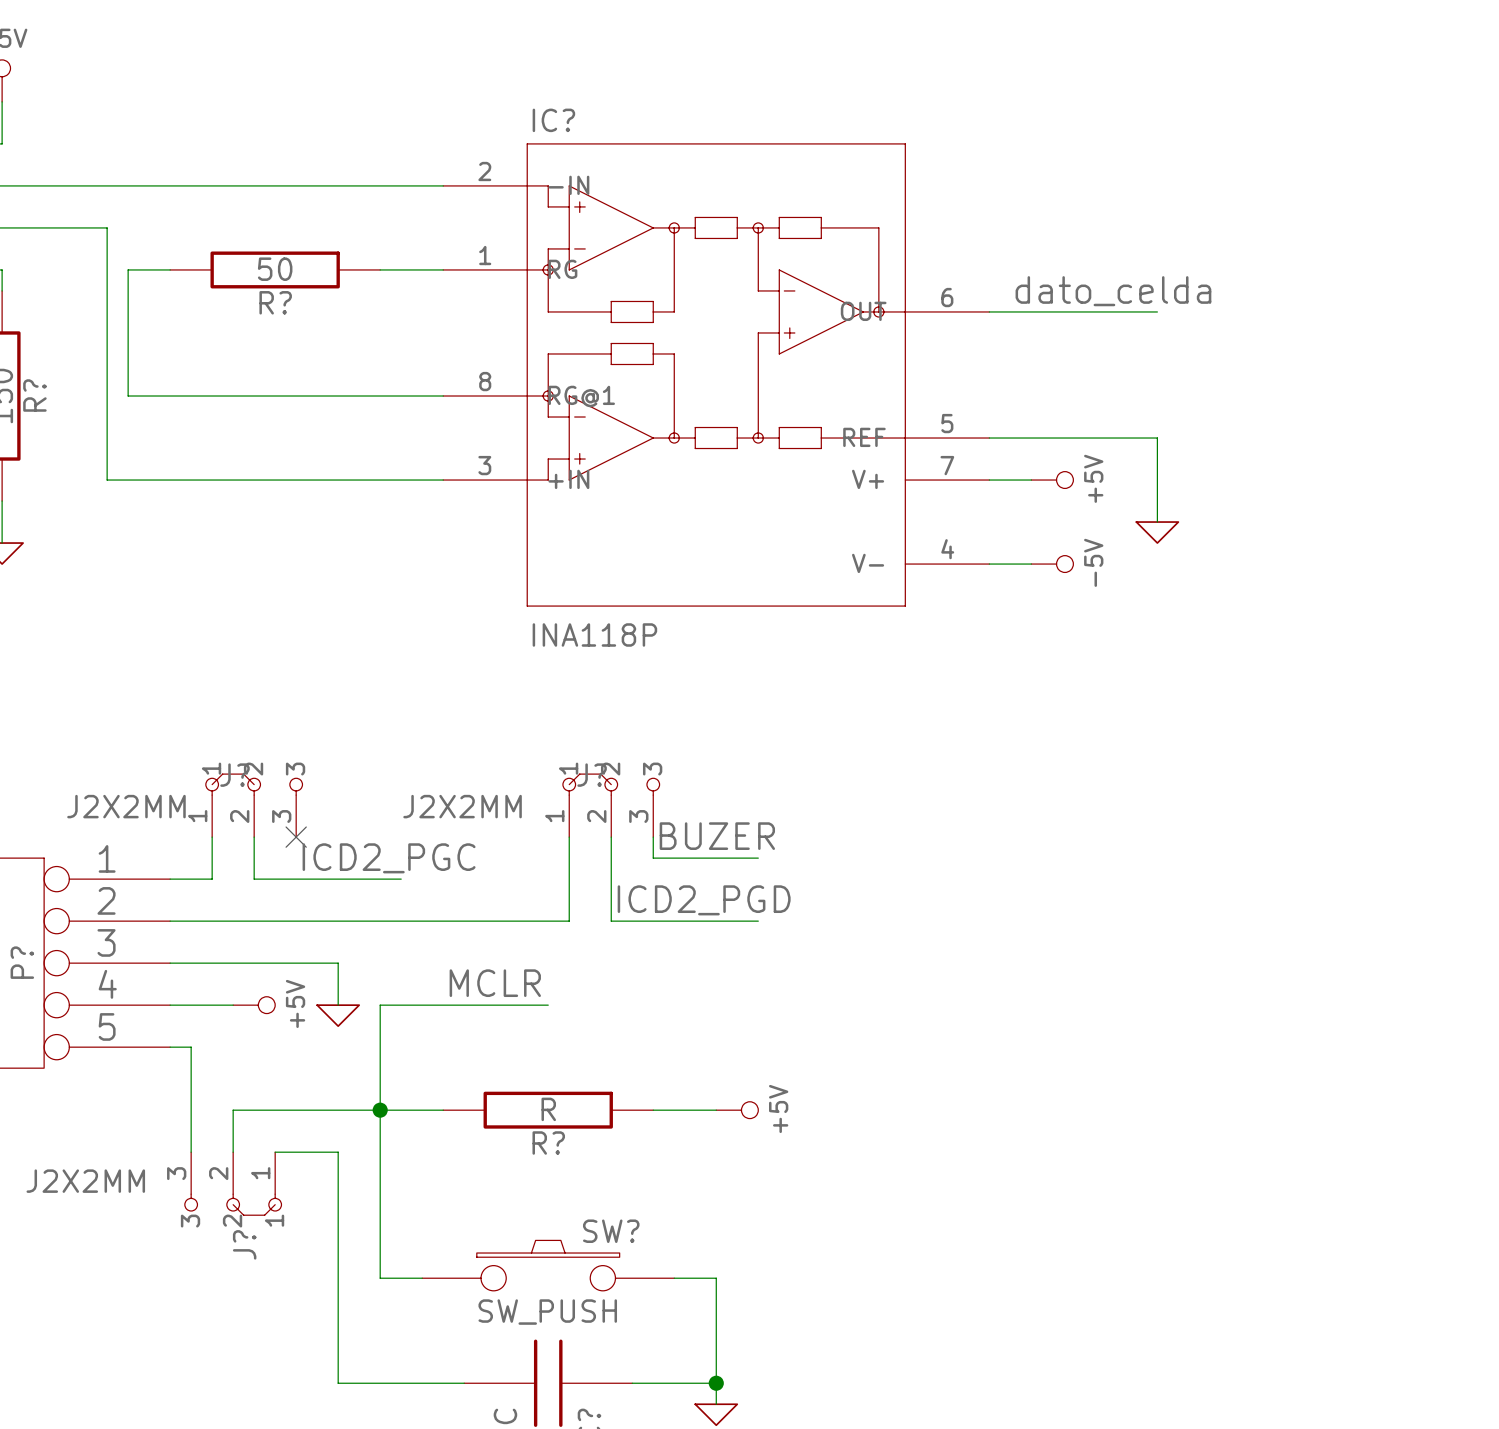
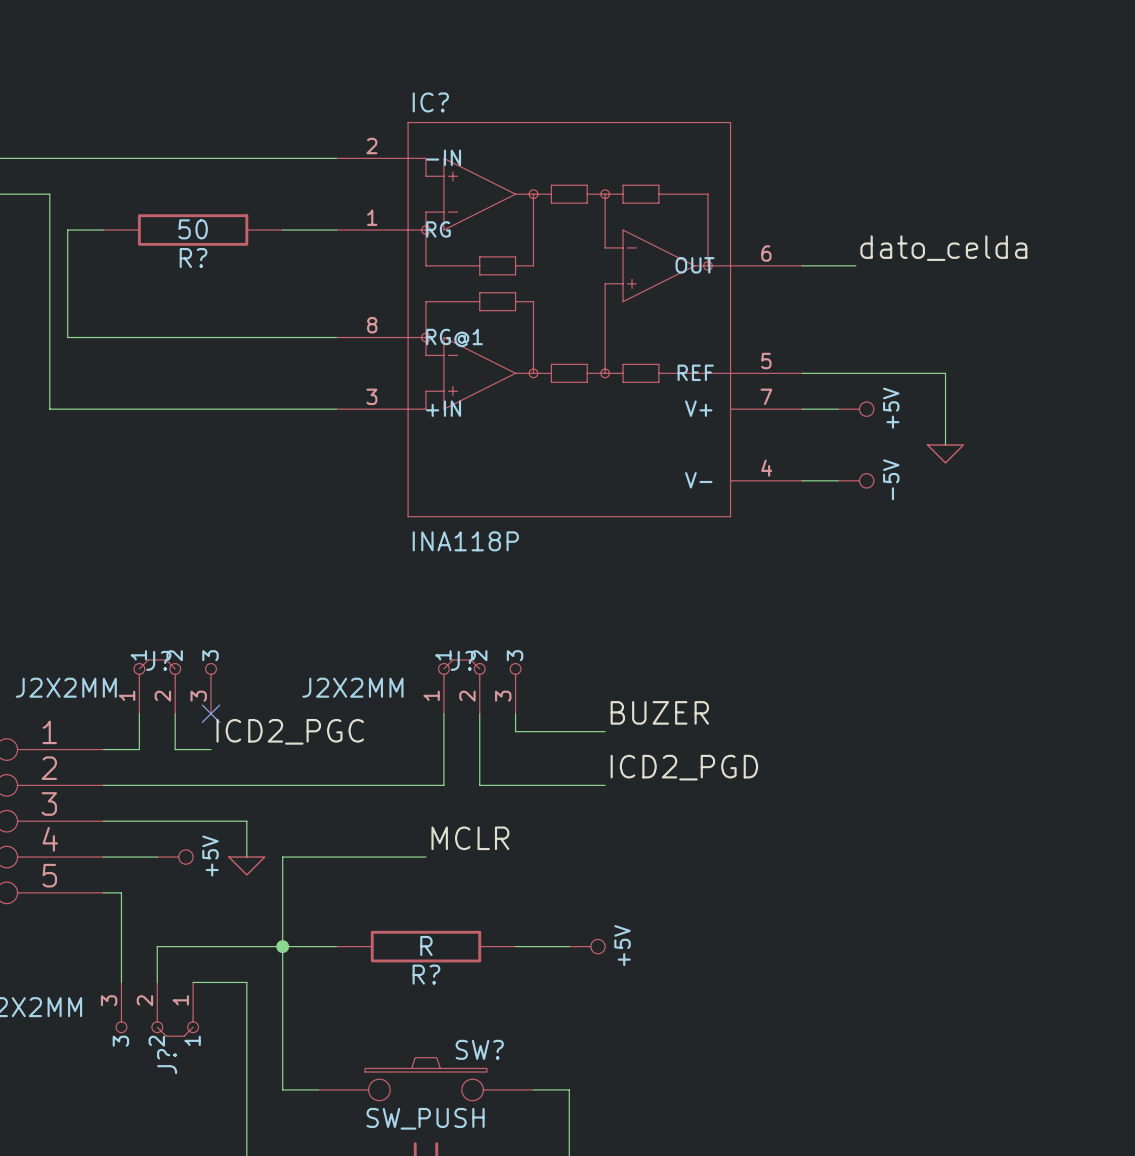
label position: dato_celda (1113, 291) -> dato_celda (943, 248)
wire: (1052, 311) (1157, 311) -> none
label position: BUZER (717, 836) -> BUZER (659, 712)
wire: (296, 879) (401, 879) -> none
label position: ICD2_PGD (704, 900) -> ICD2_PGD (684, 767)
label position: MCLR (495, 983) -> MCLR (470, 838)

